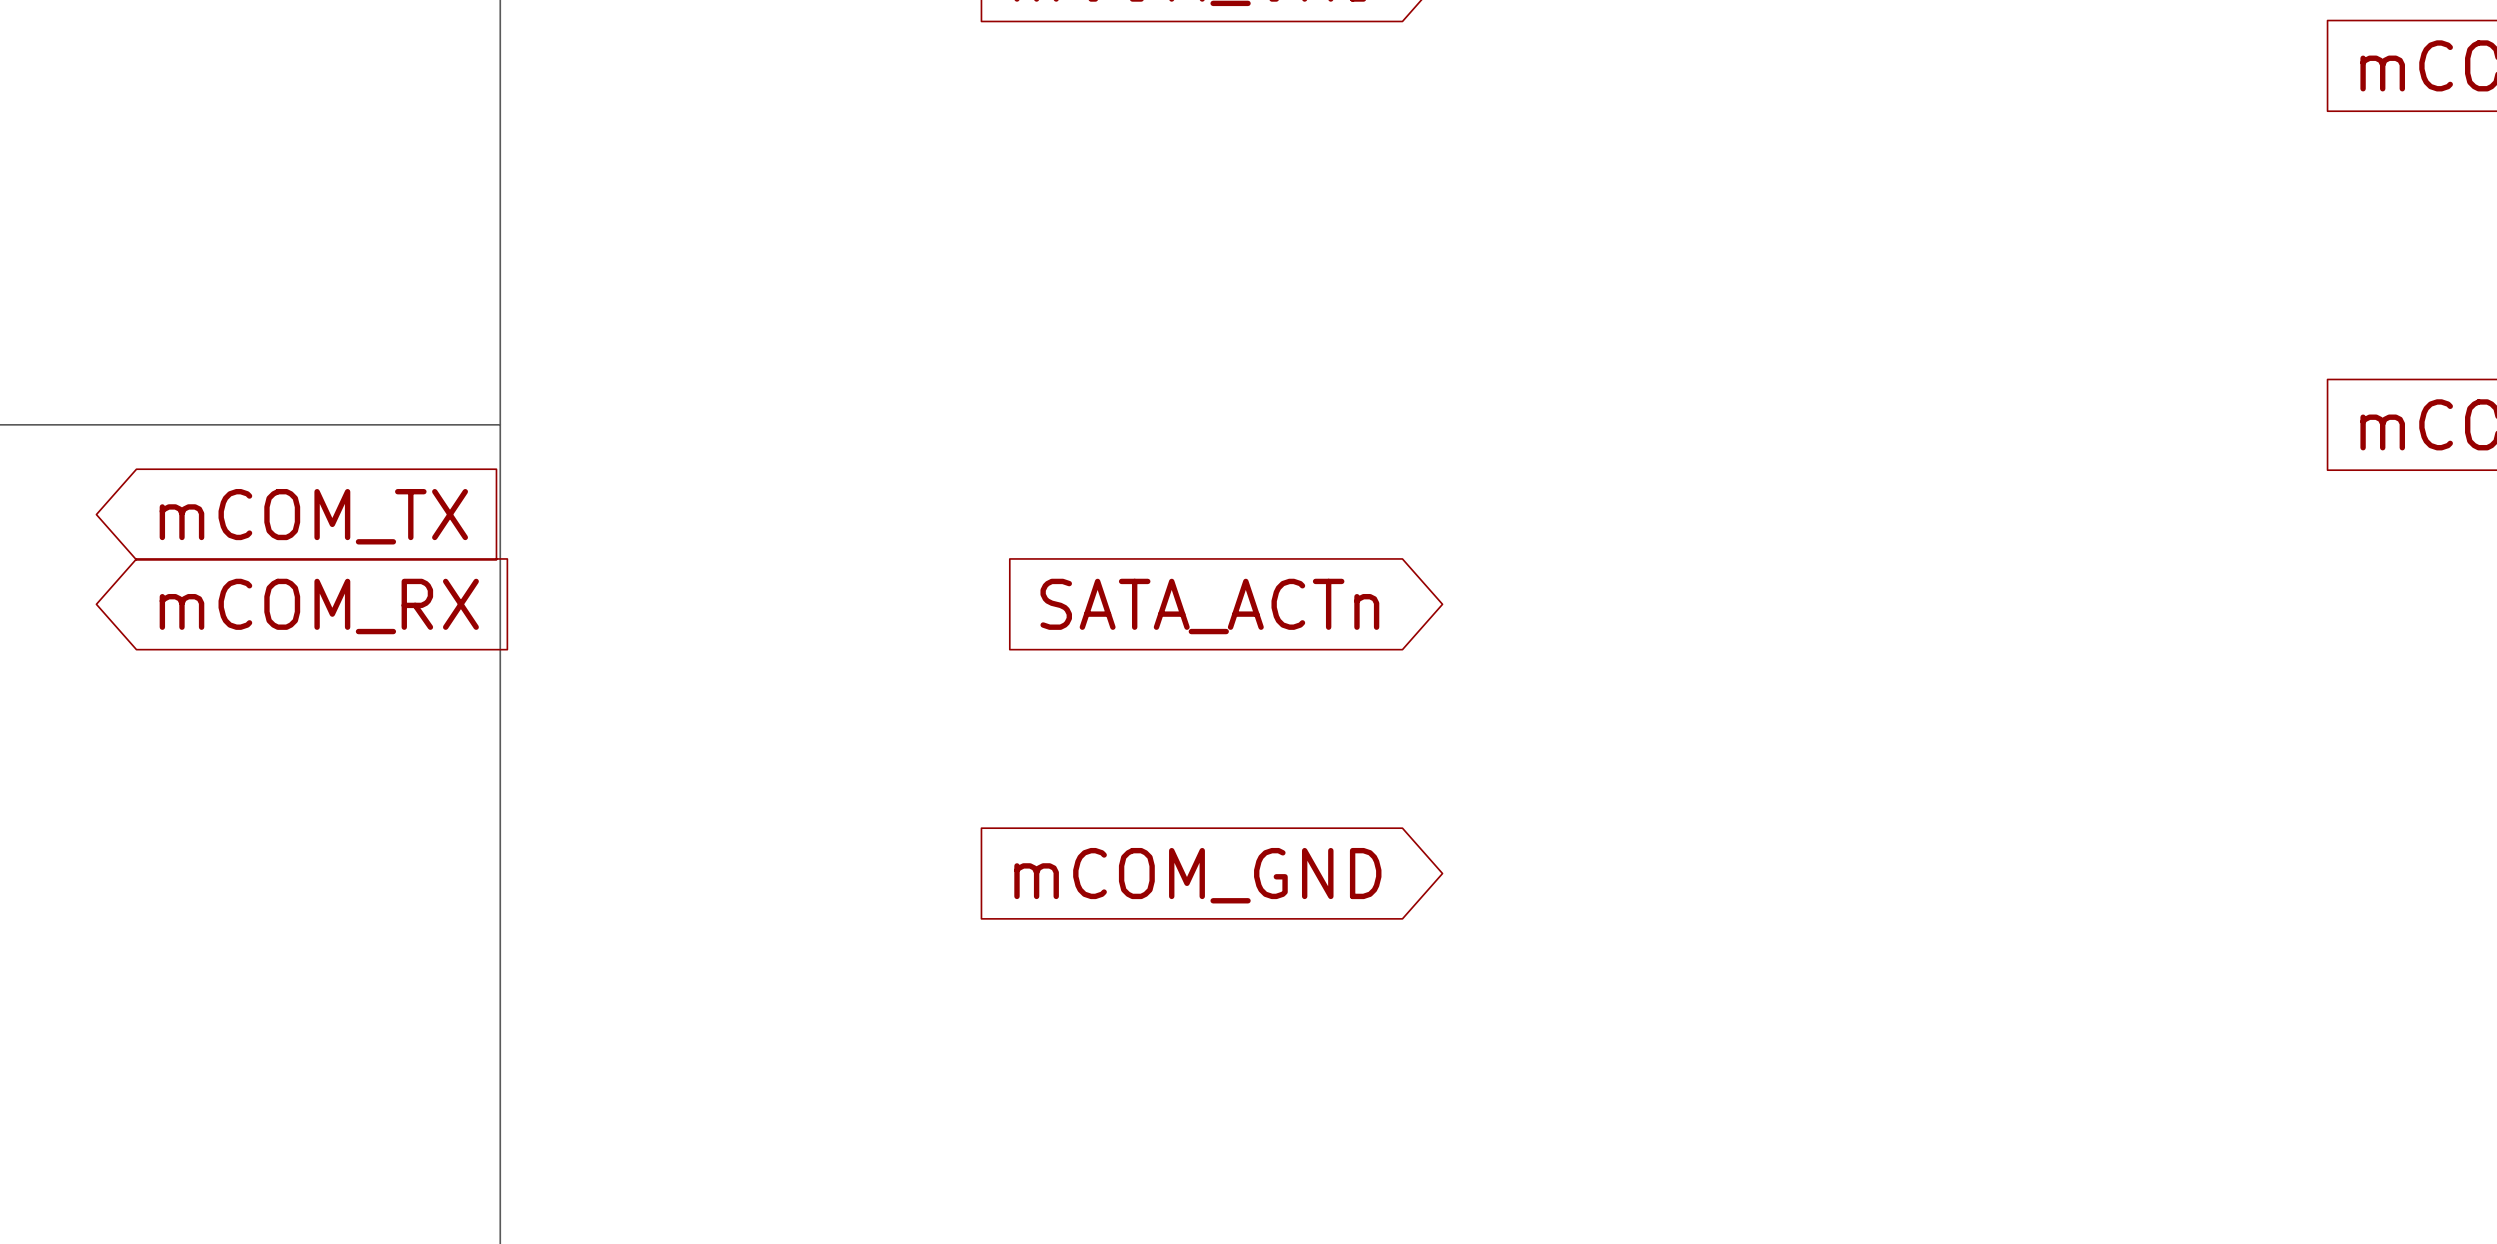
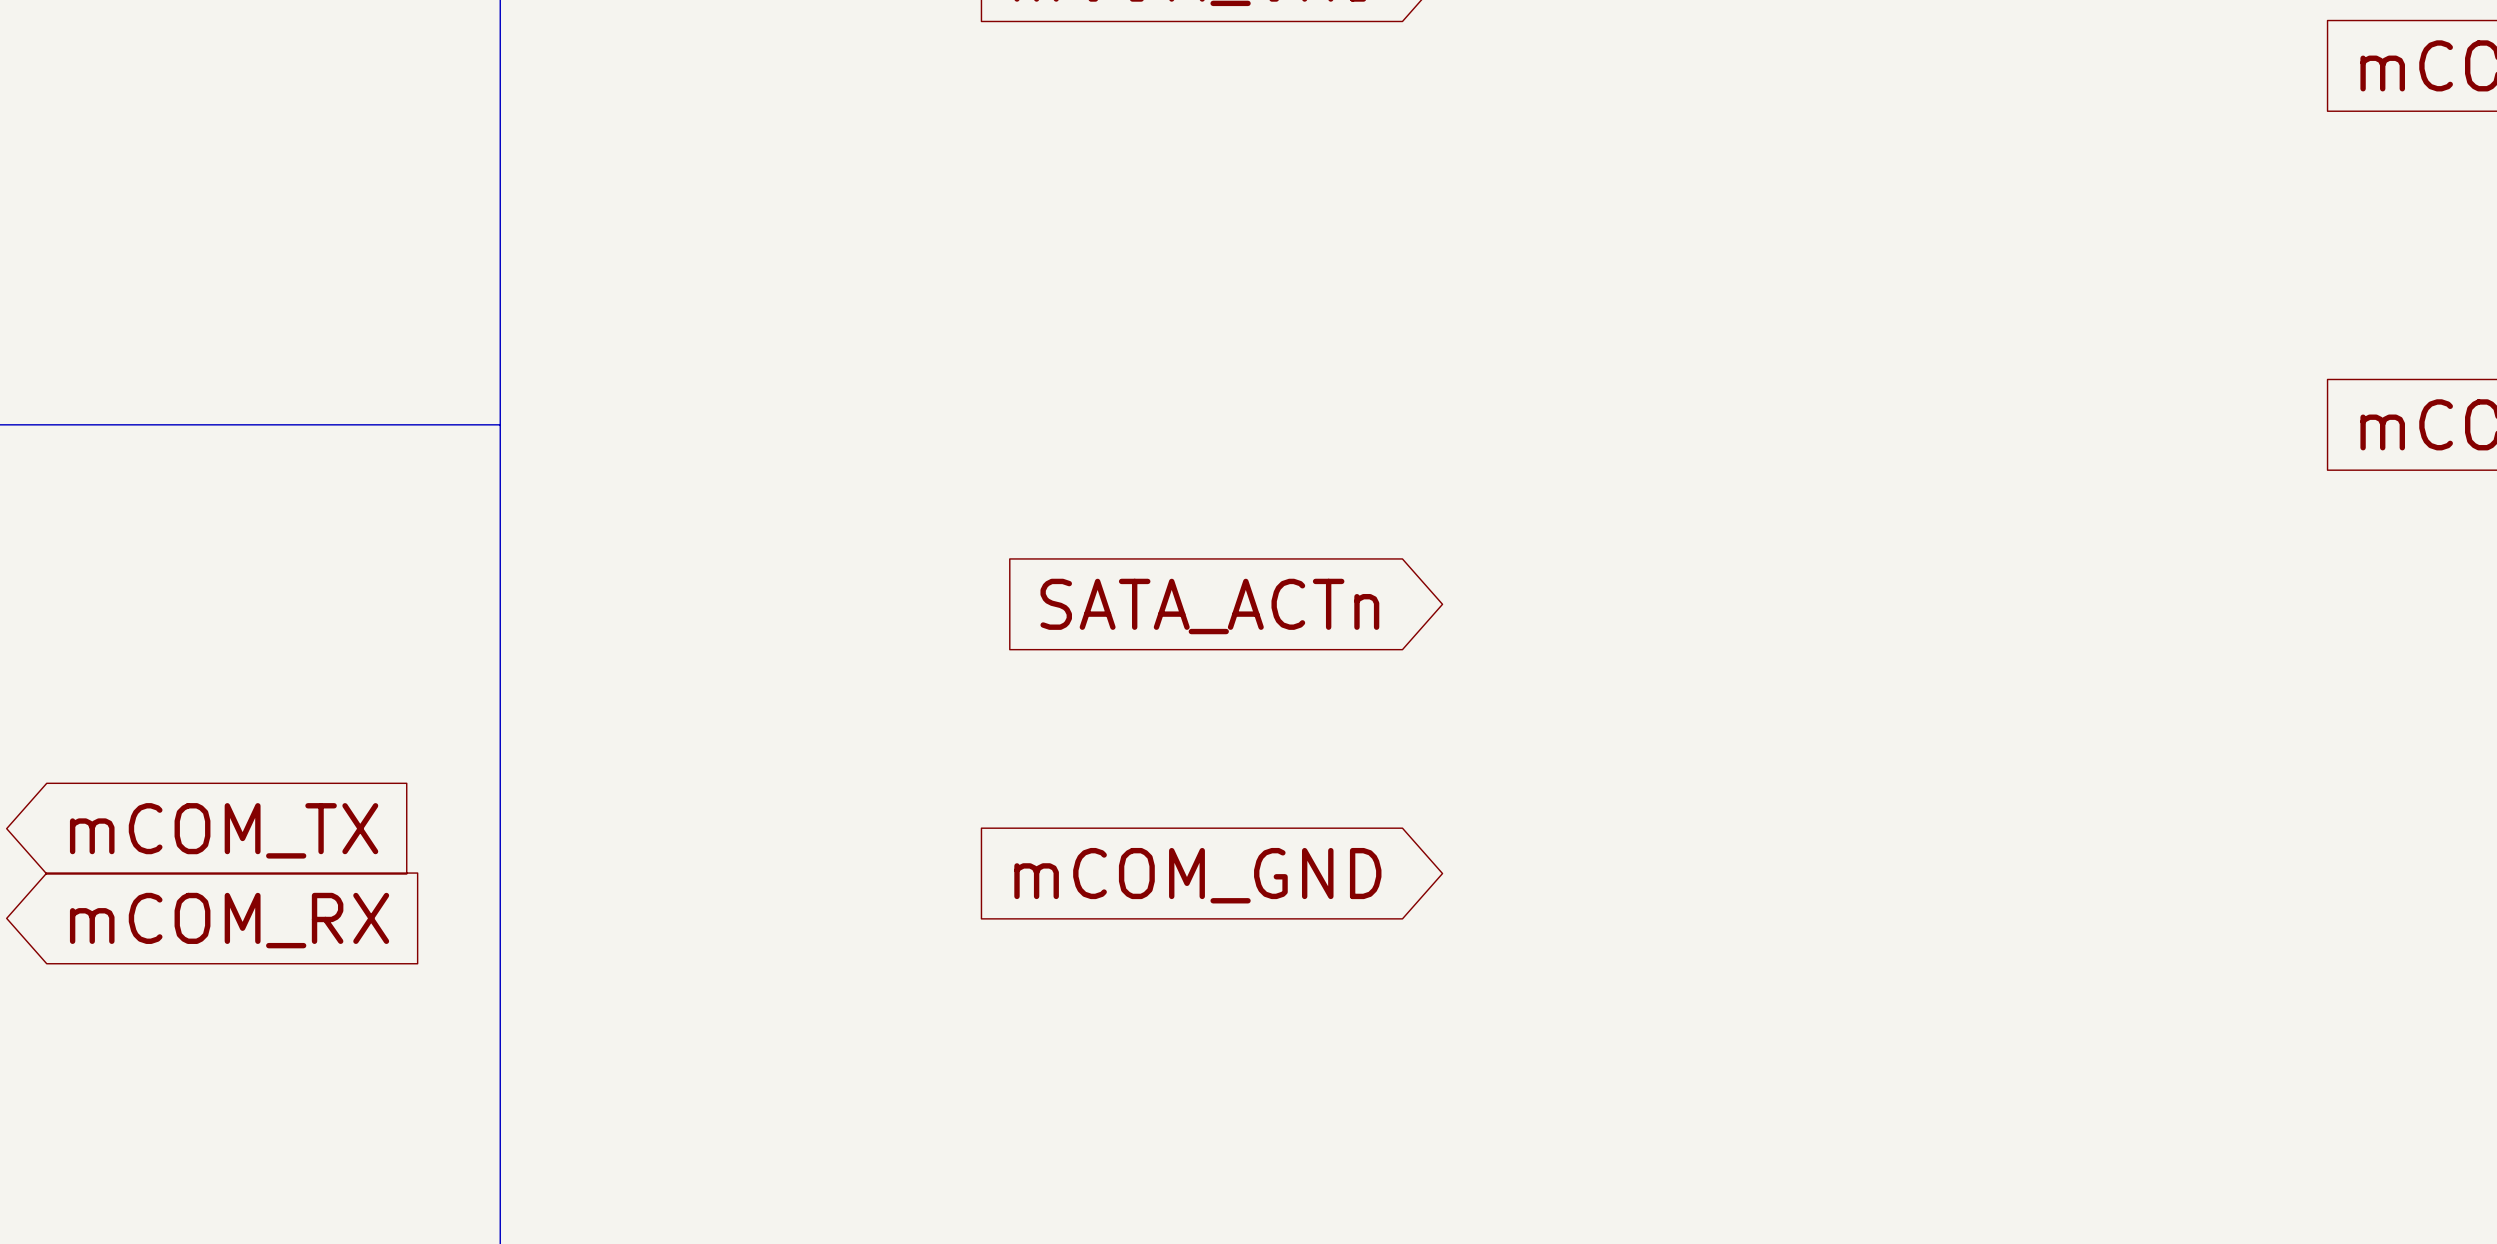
global label position: mCOM_TX (313, 516) -> mCOM_TX (224, 830)
global label position: mCOM_RX (319, 606) -> mCOM_RX (229, 920)

